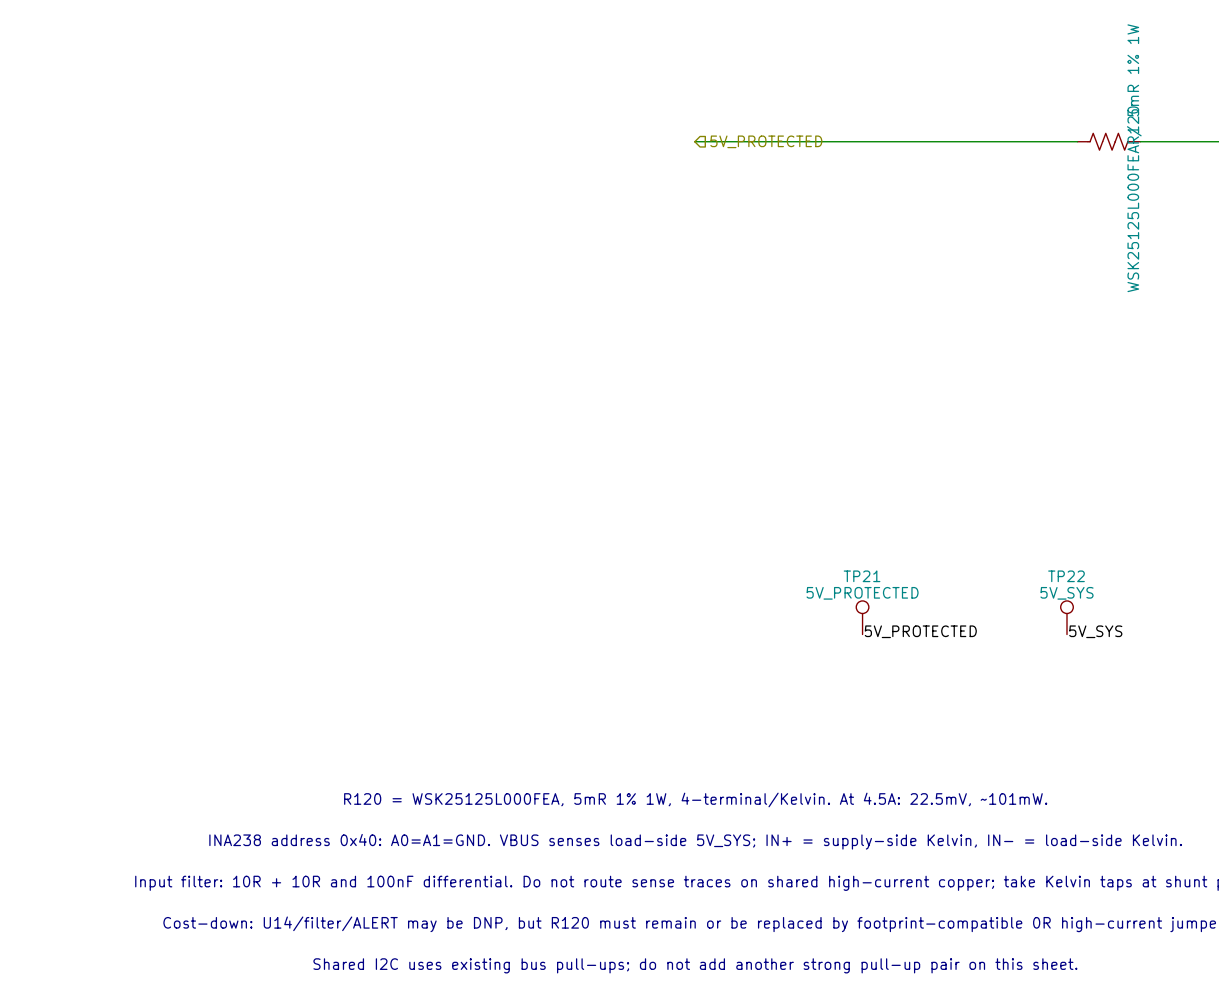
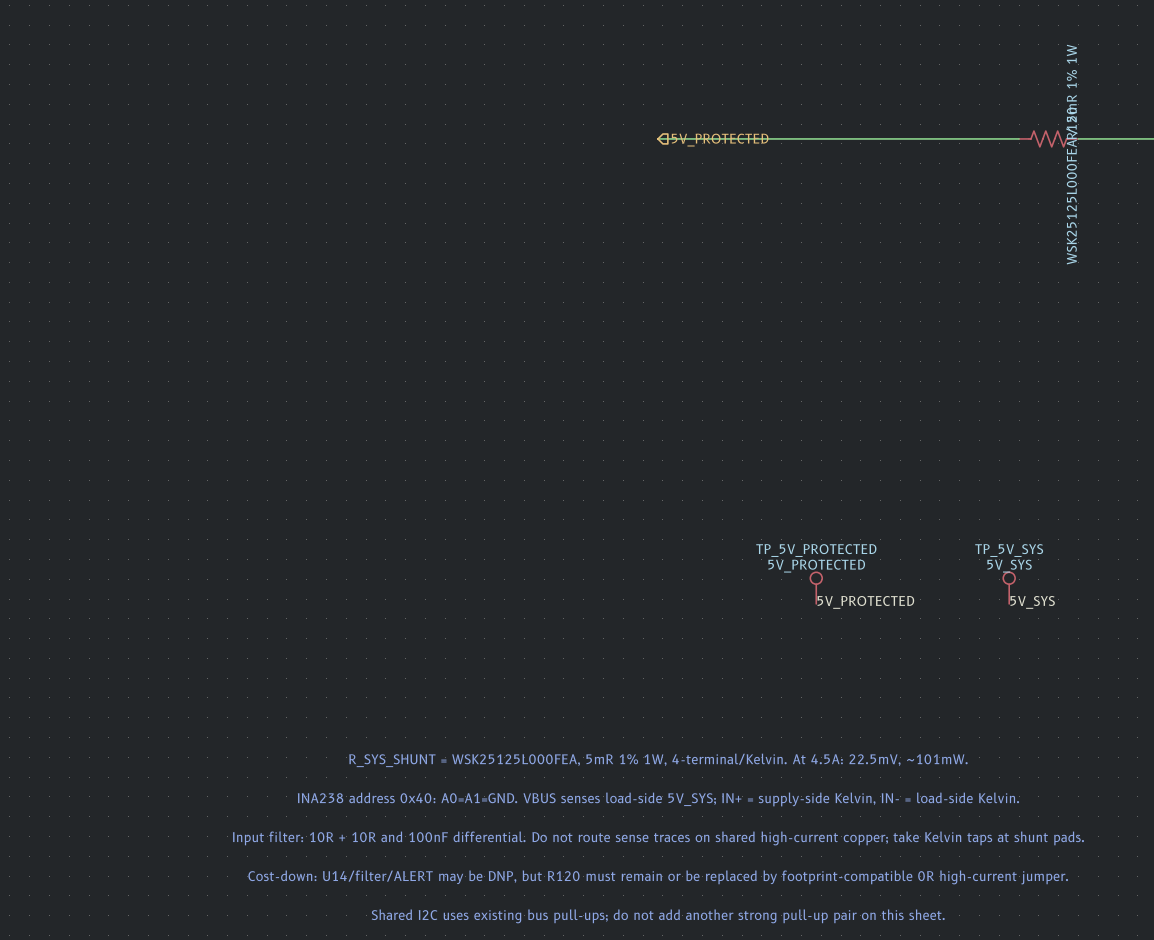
TP21 name: TP21 (862, 576) -> TP_5V_PROTECTED (816, 550)
TP22 name: TP22 (1066, 576) -> TP_5V_SYS (1009, 550)
text: R120 = WSK25125L000FEA, 5mR 1% 1W, 4-terminal/Kelvin. At 4.5A: 22.5mV, ~101mW. (695, 799) -> R_SYS_SHUNT = WSK25125L000FEA, 5mR 1% 1W, 4-terminal/Kelvin. At 4.5A: 22.5mV, ~101mW. (658, 760)

